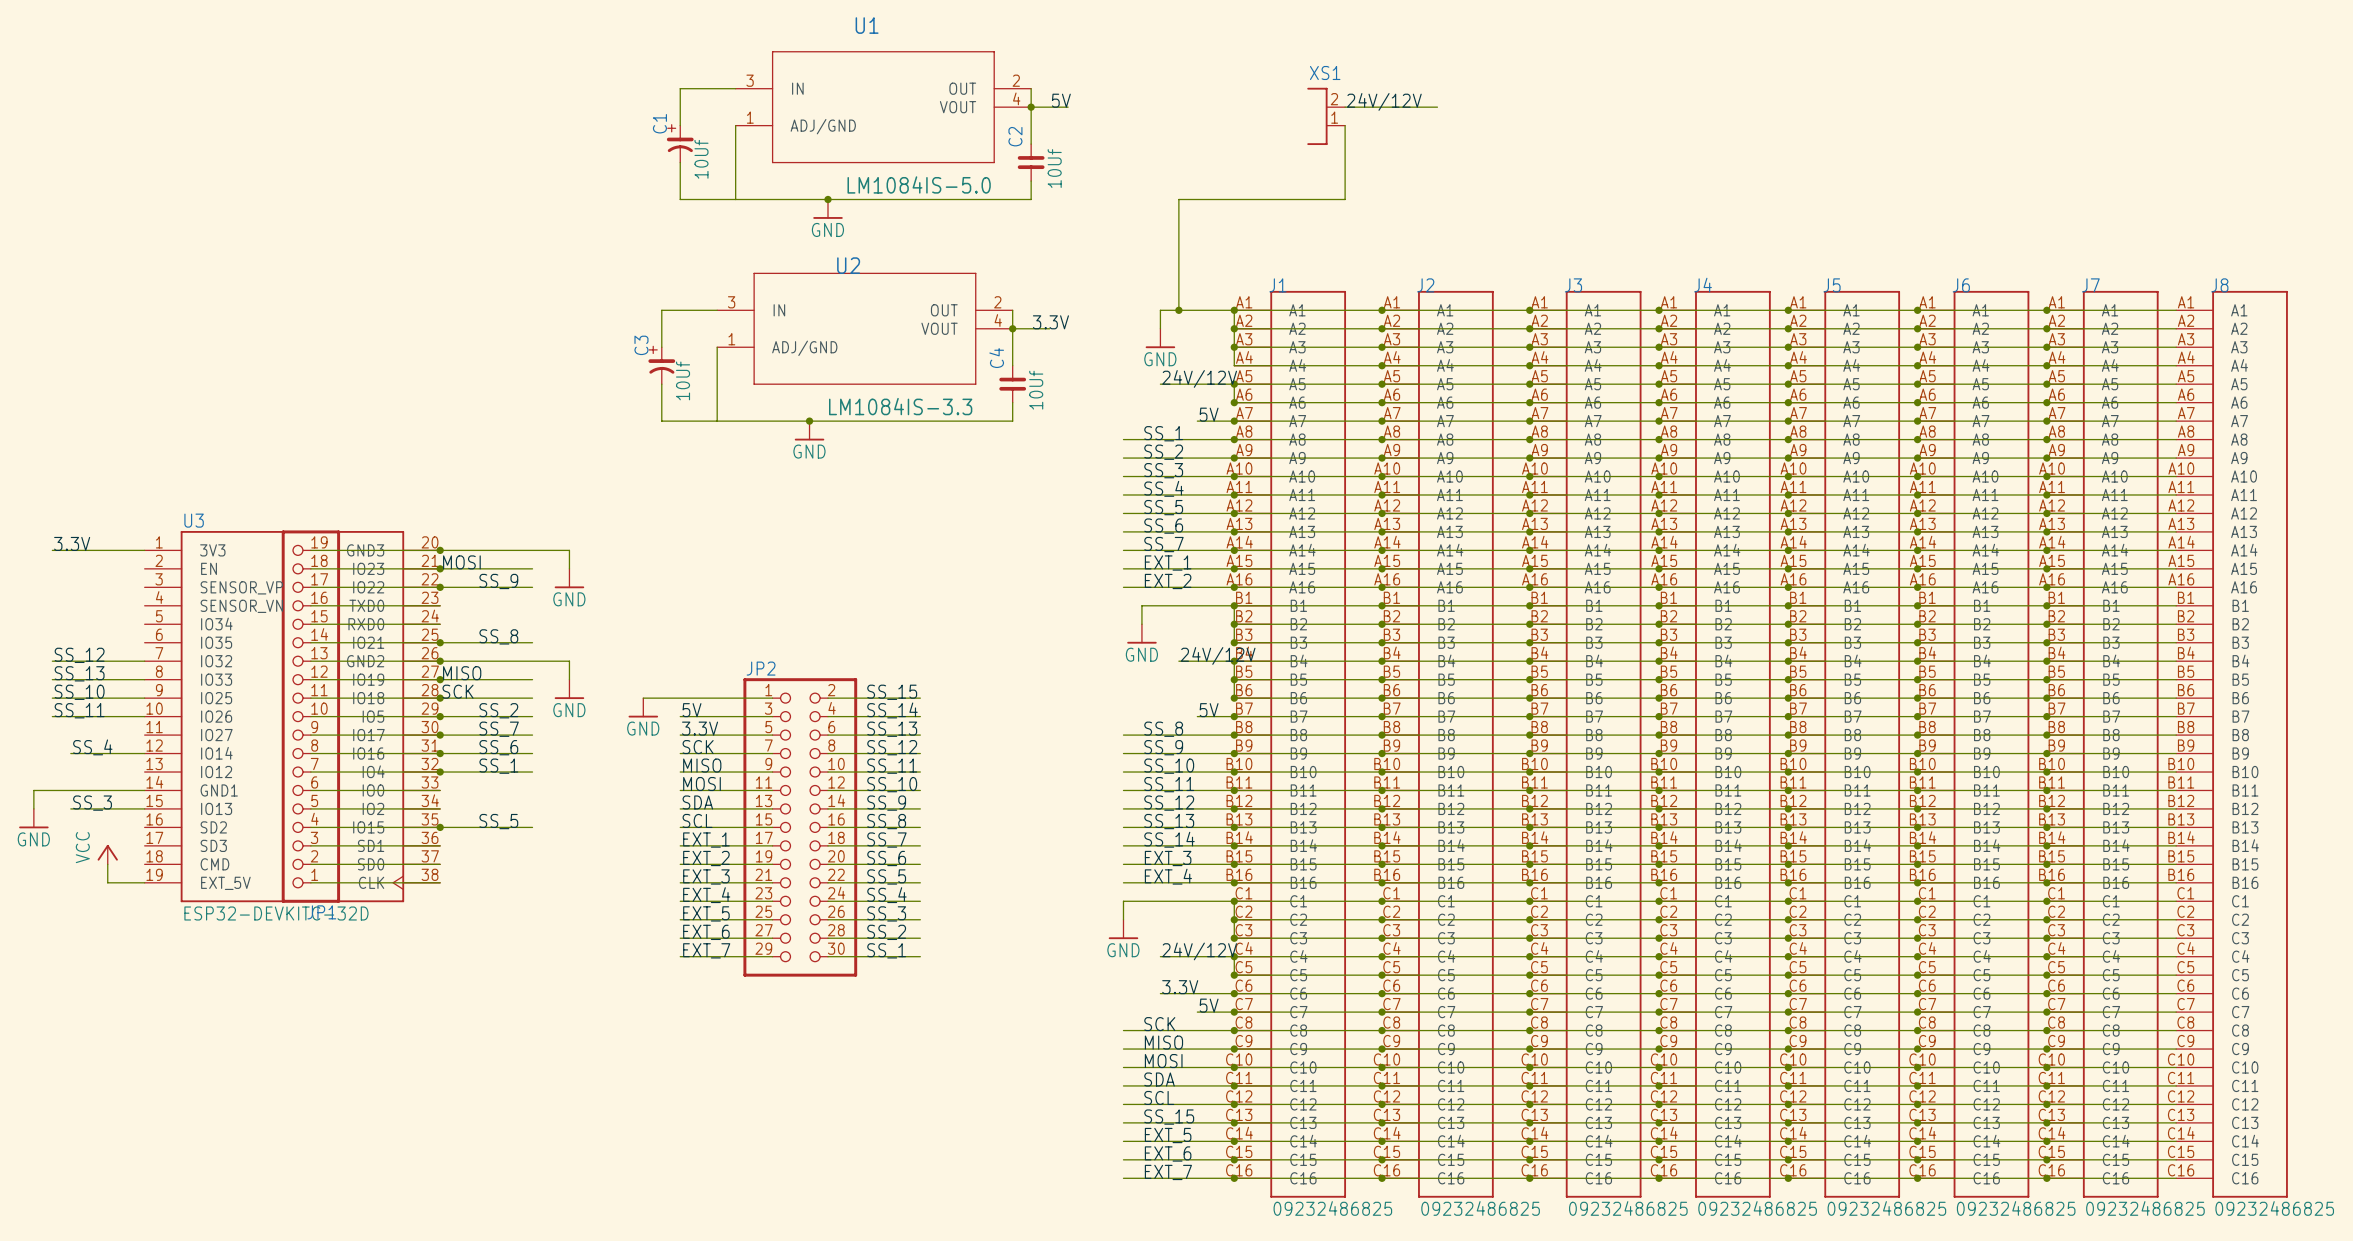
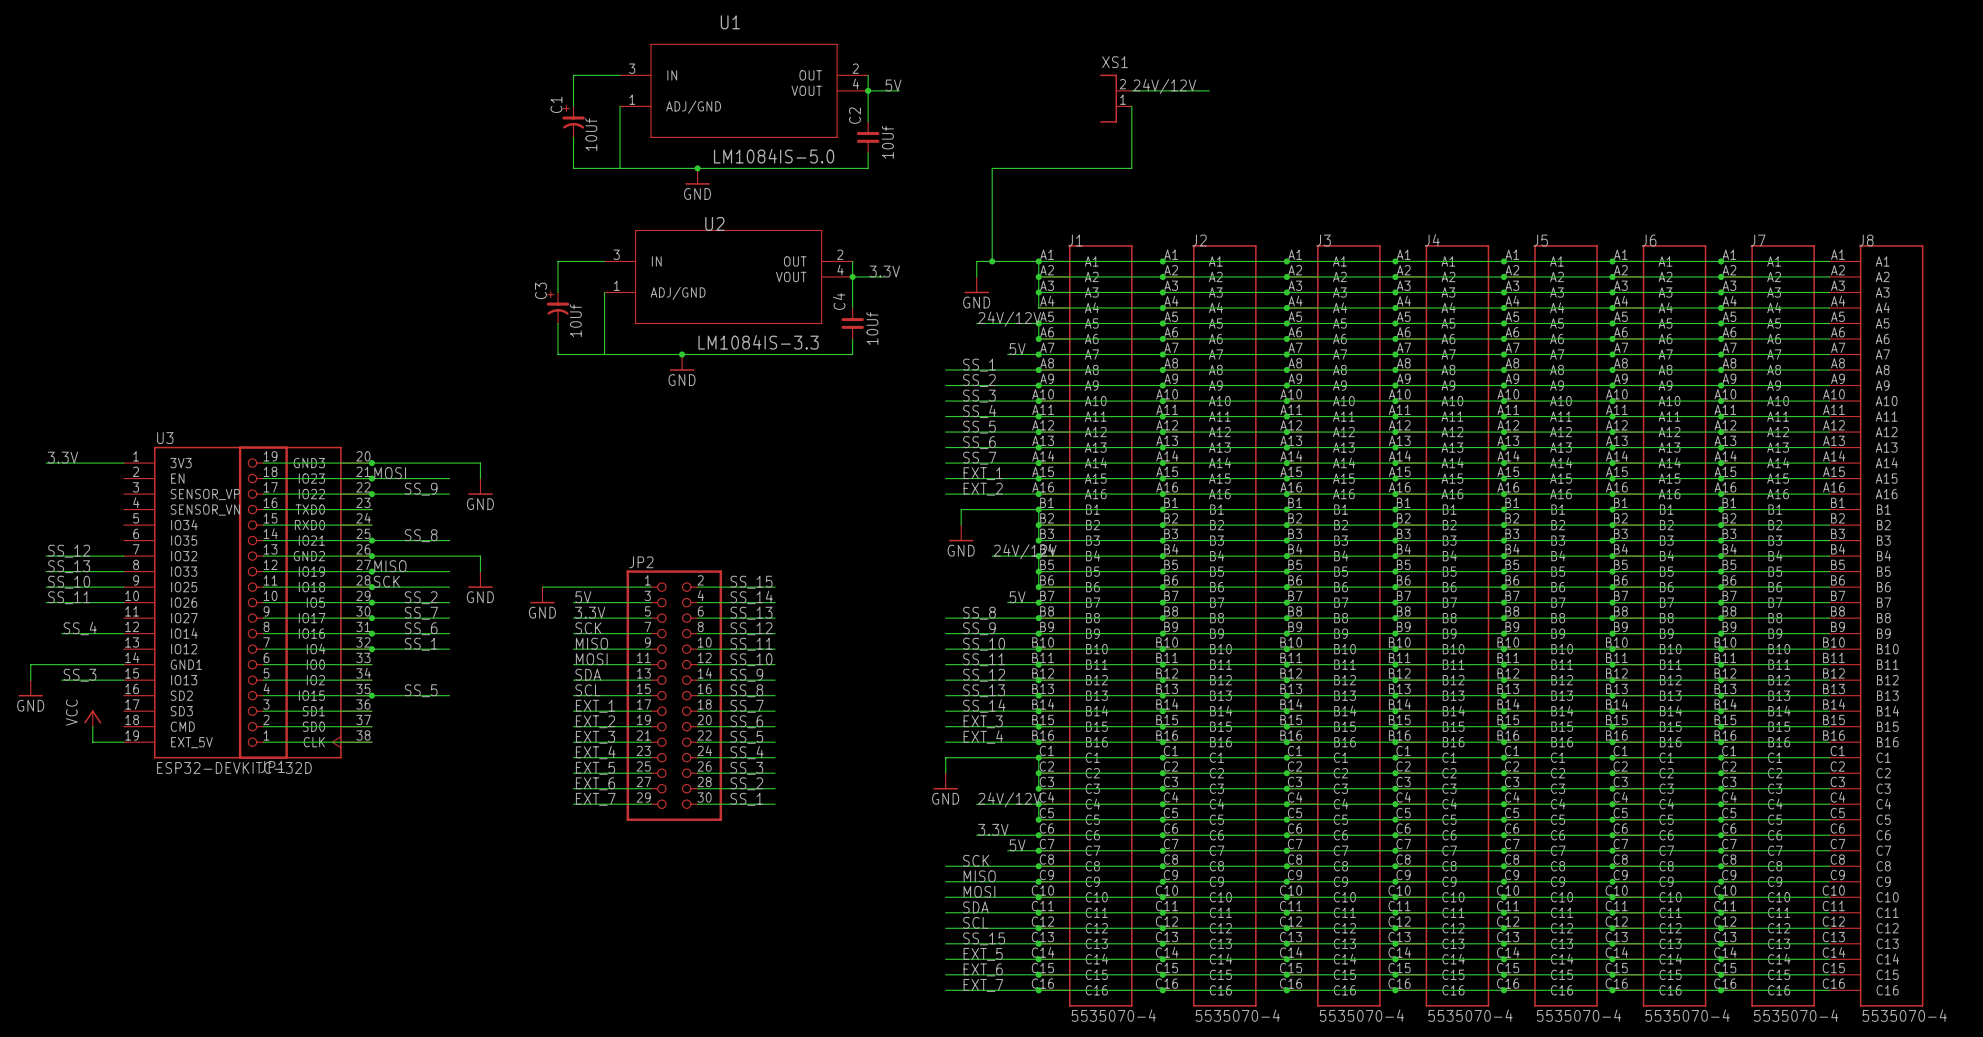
J1 value: 09232486825 (1332, 1208) -> 5535070-4 (1113, 1015)
J2 value: 09232486825 (1480, 1208) -> 5535070-4 (1237, 1015)
J3 value: 09232486825 (1628, 1208) -> 5535070-4 (1361, 1015)
J4 value: 09232486825 (1757, 1208) -> 5535070-4 (1470, 1015)
J5 value: 09232486825 (1886, 1208) -> 5535070-4 (1579, 1015)
J6 value: 09232486825 (2016, 1208) -> 5535070-4 (1687, 1015)
J7 value: 09232486825 (2145, 1208) -> 5535070-4 (1796, 1015)
J8 value: 09232486825 (2274, 1208) -> 5535070-4 (1904, 1015)

